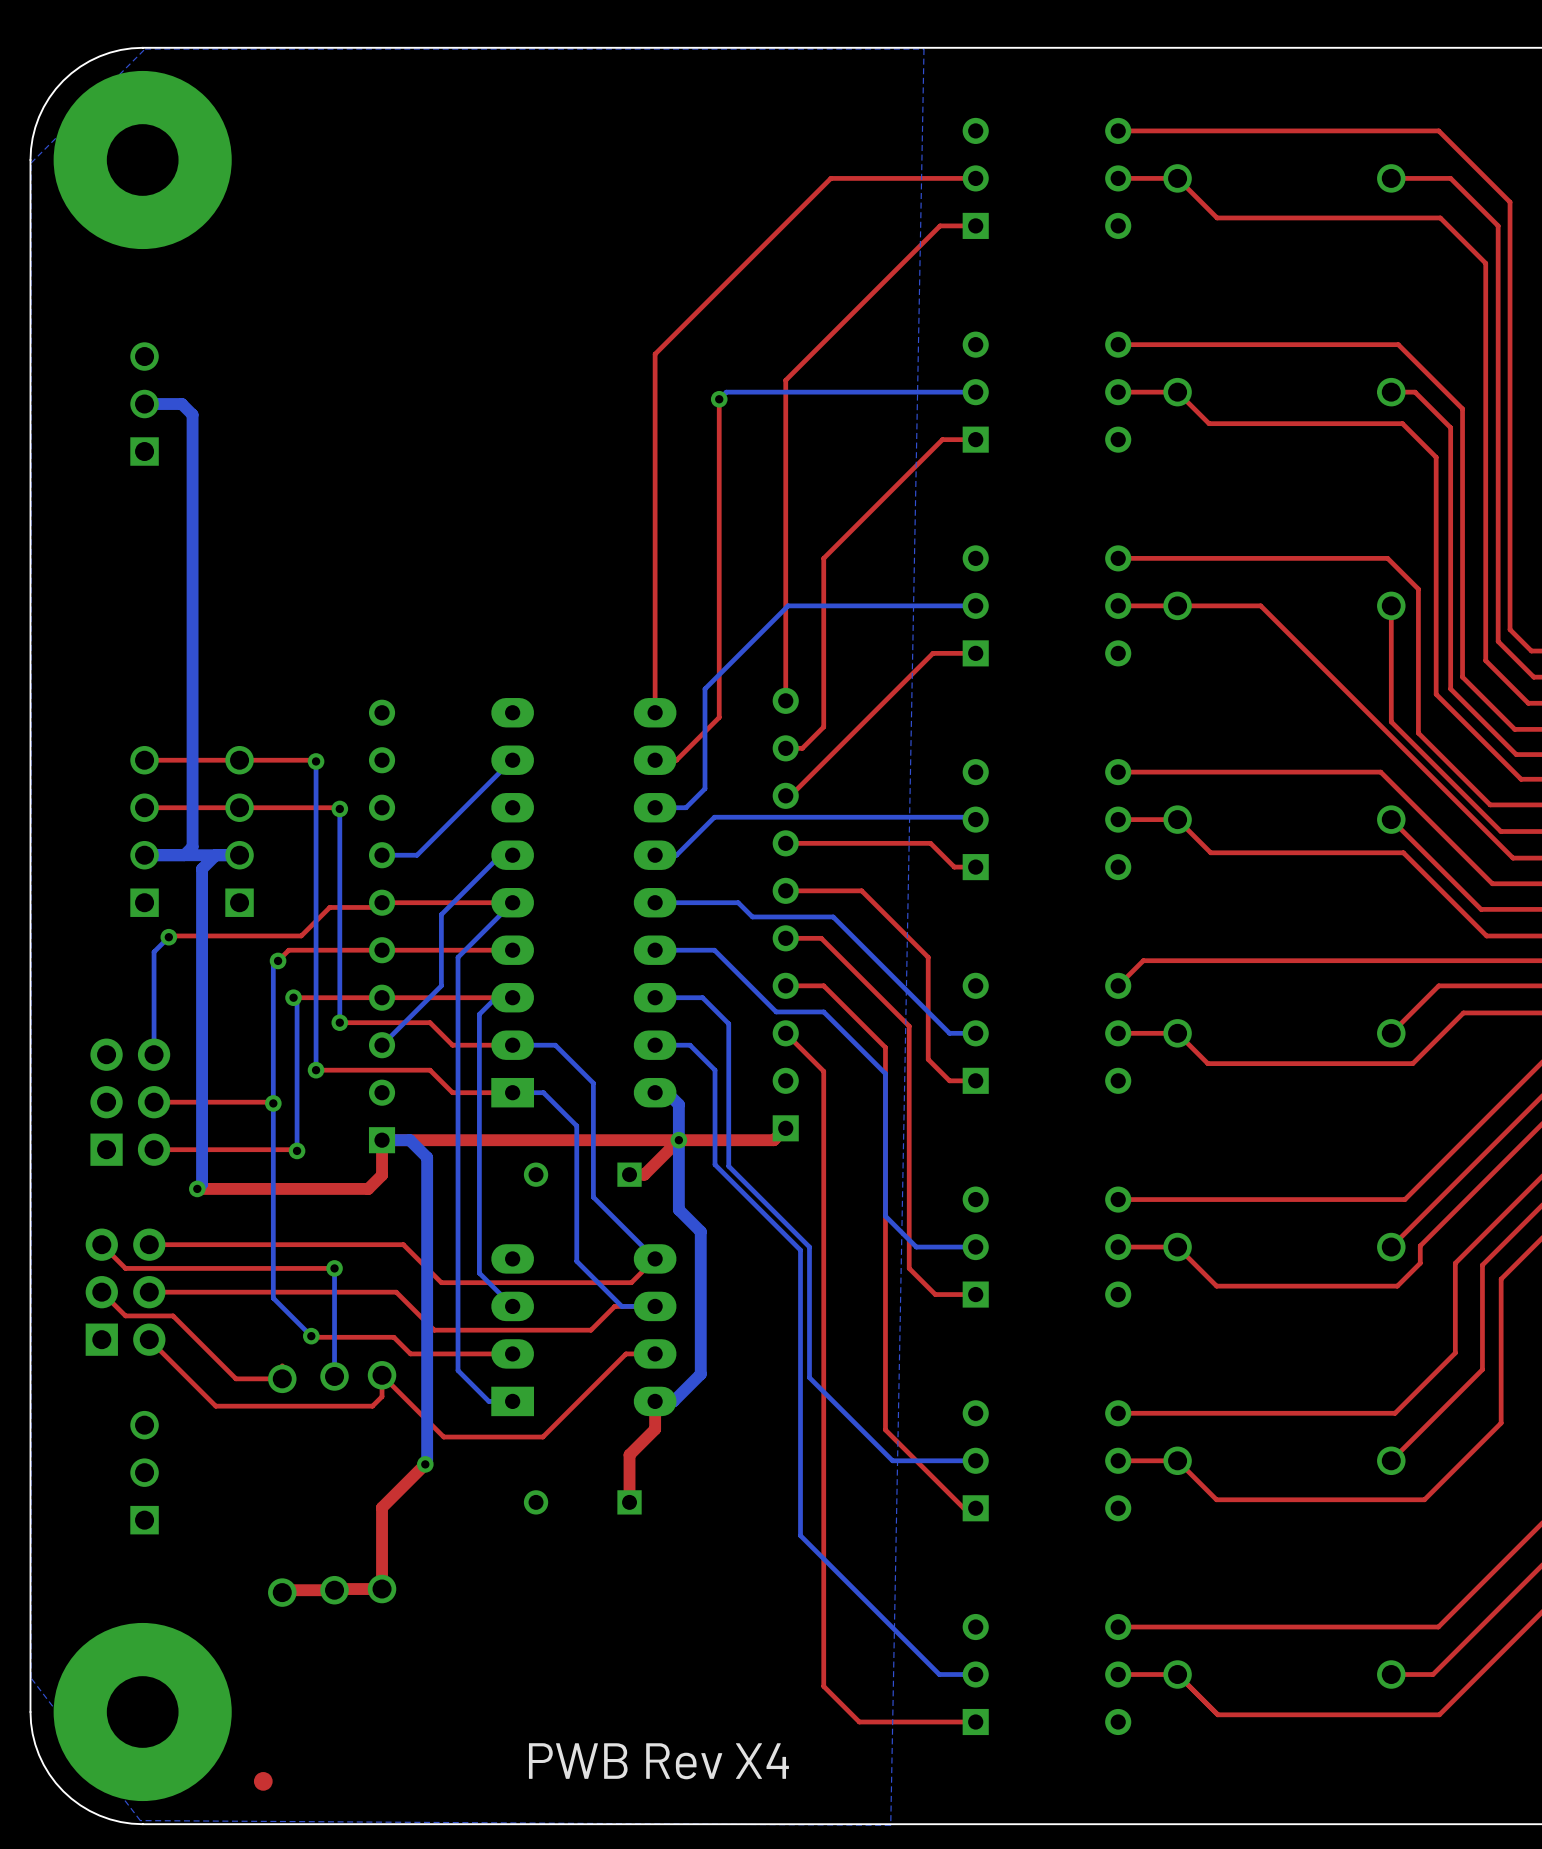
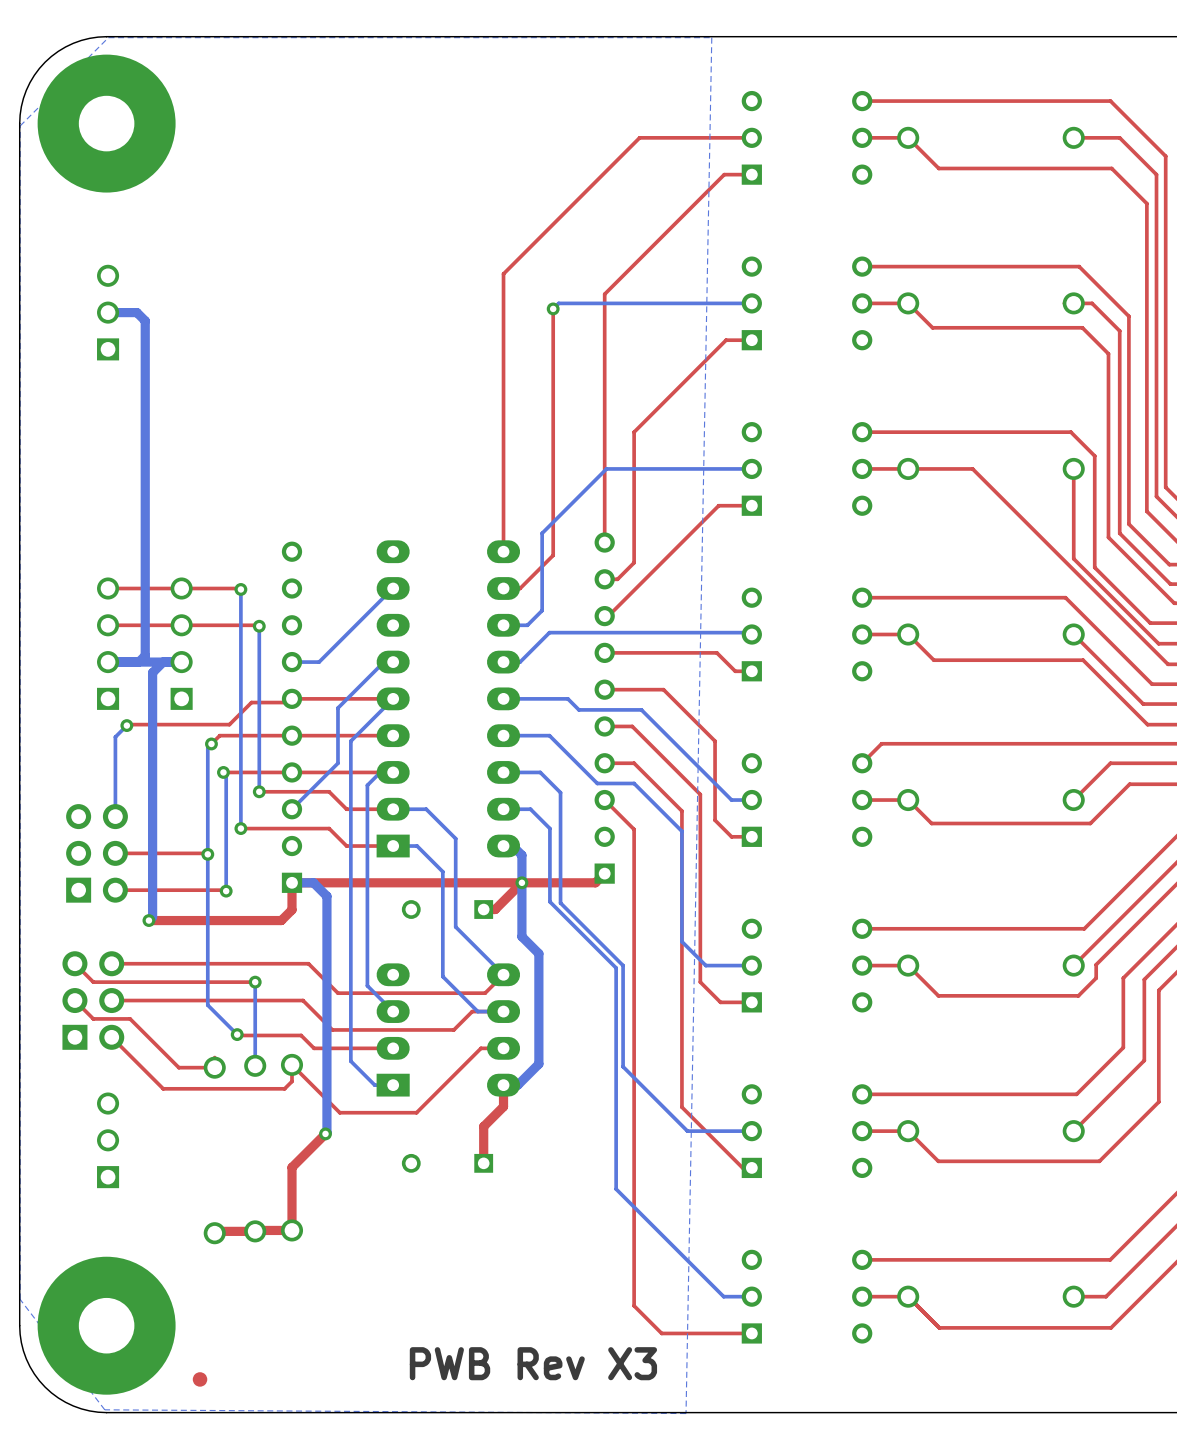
text: PWB Rev X4 (658, 1761) -> PWB Rev X3 (533, 1363)

